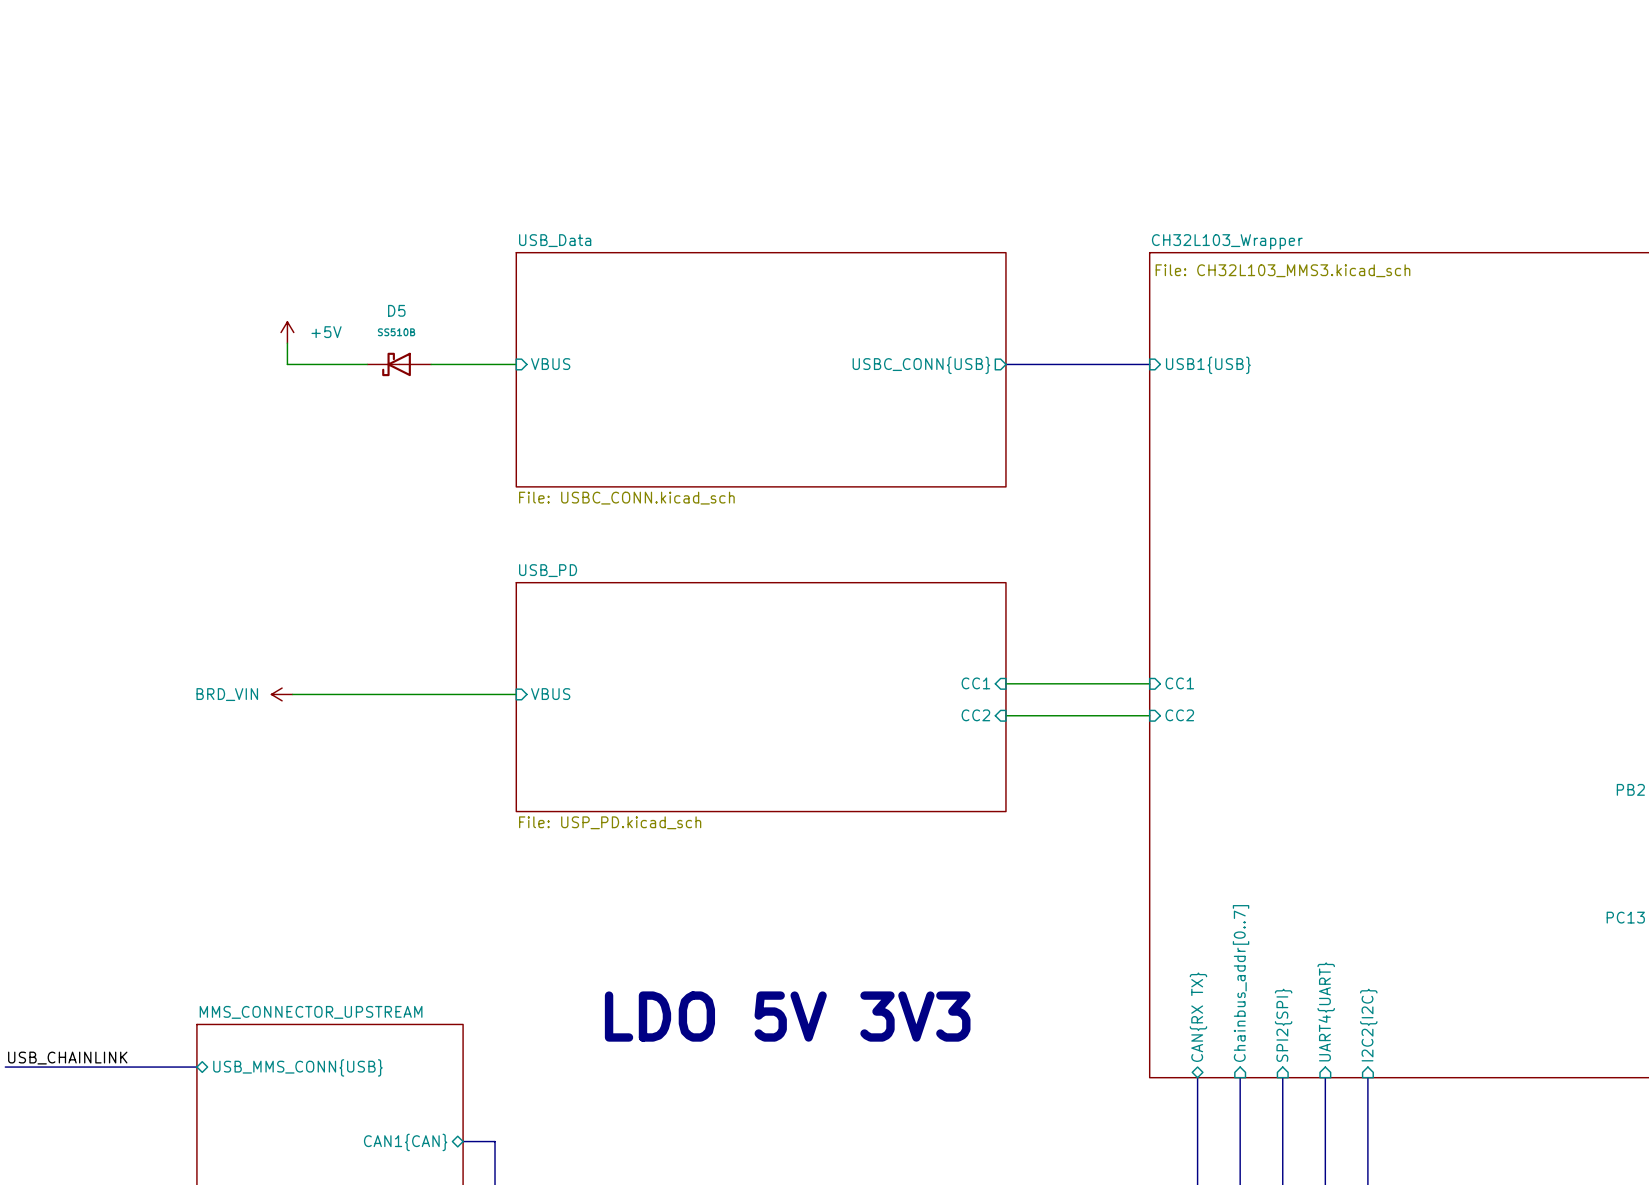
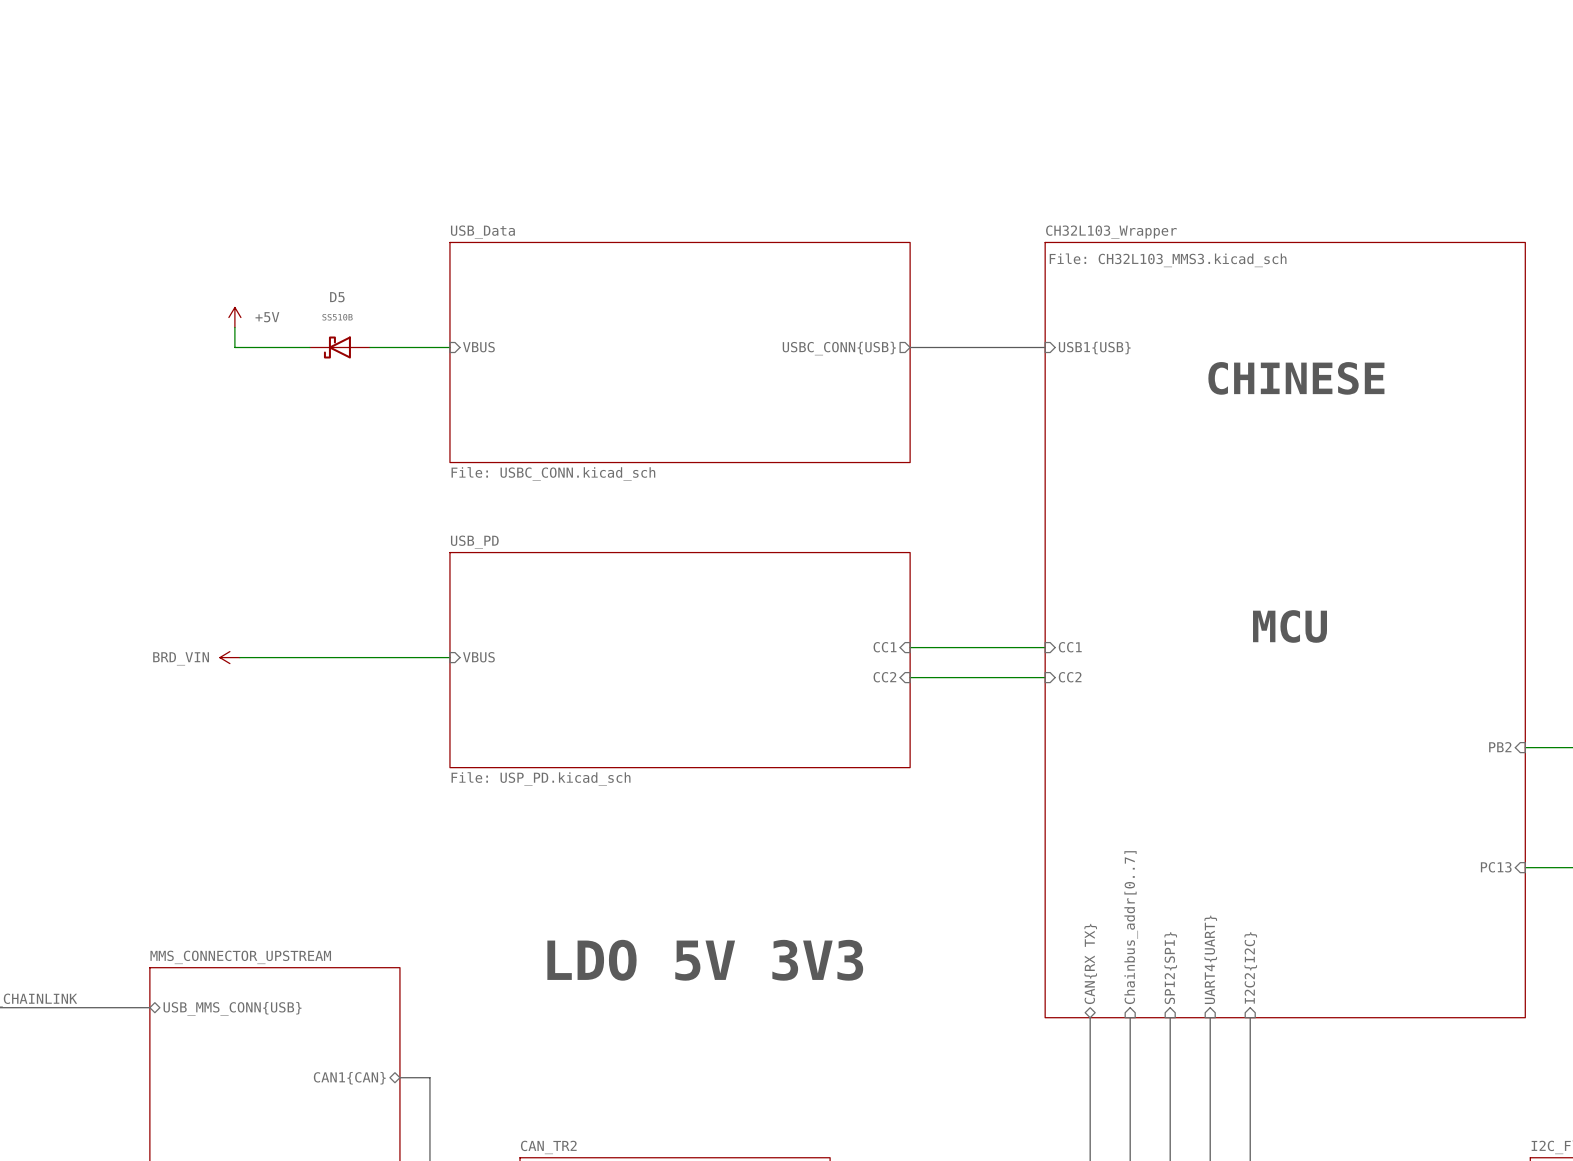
text: none -> CHINESE (1296, 378)
text: none -> MCU (1290, 626)

